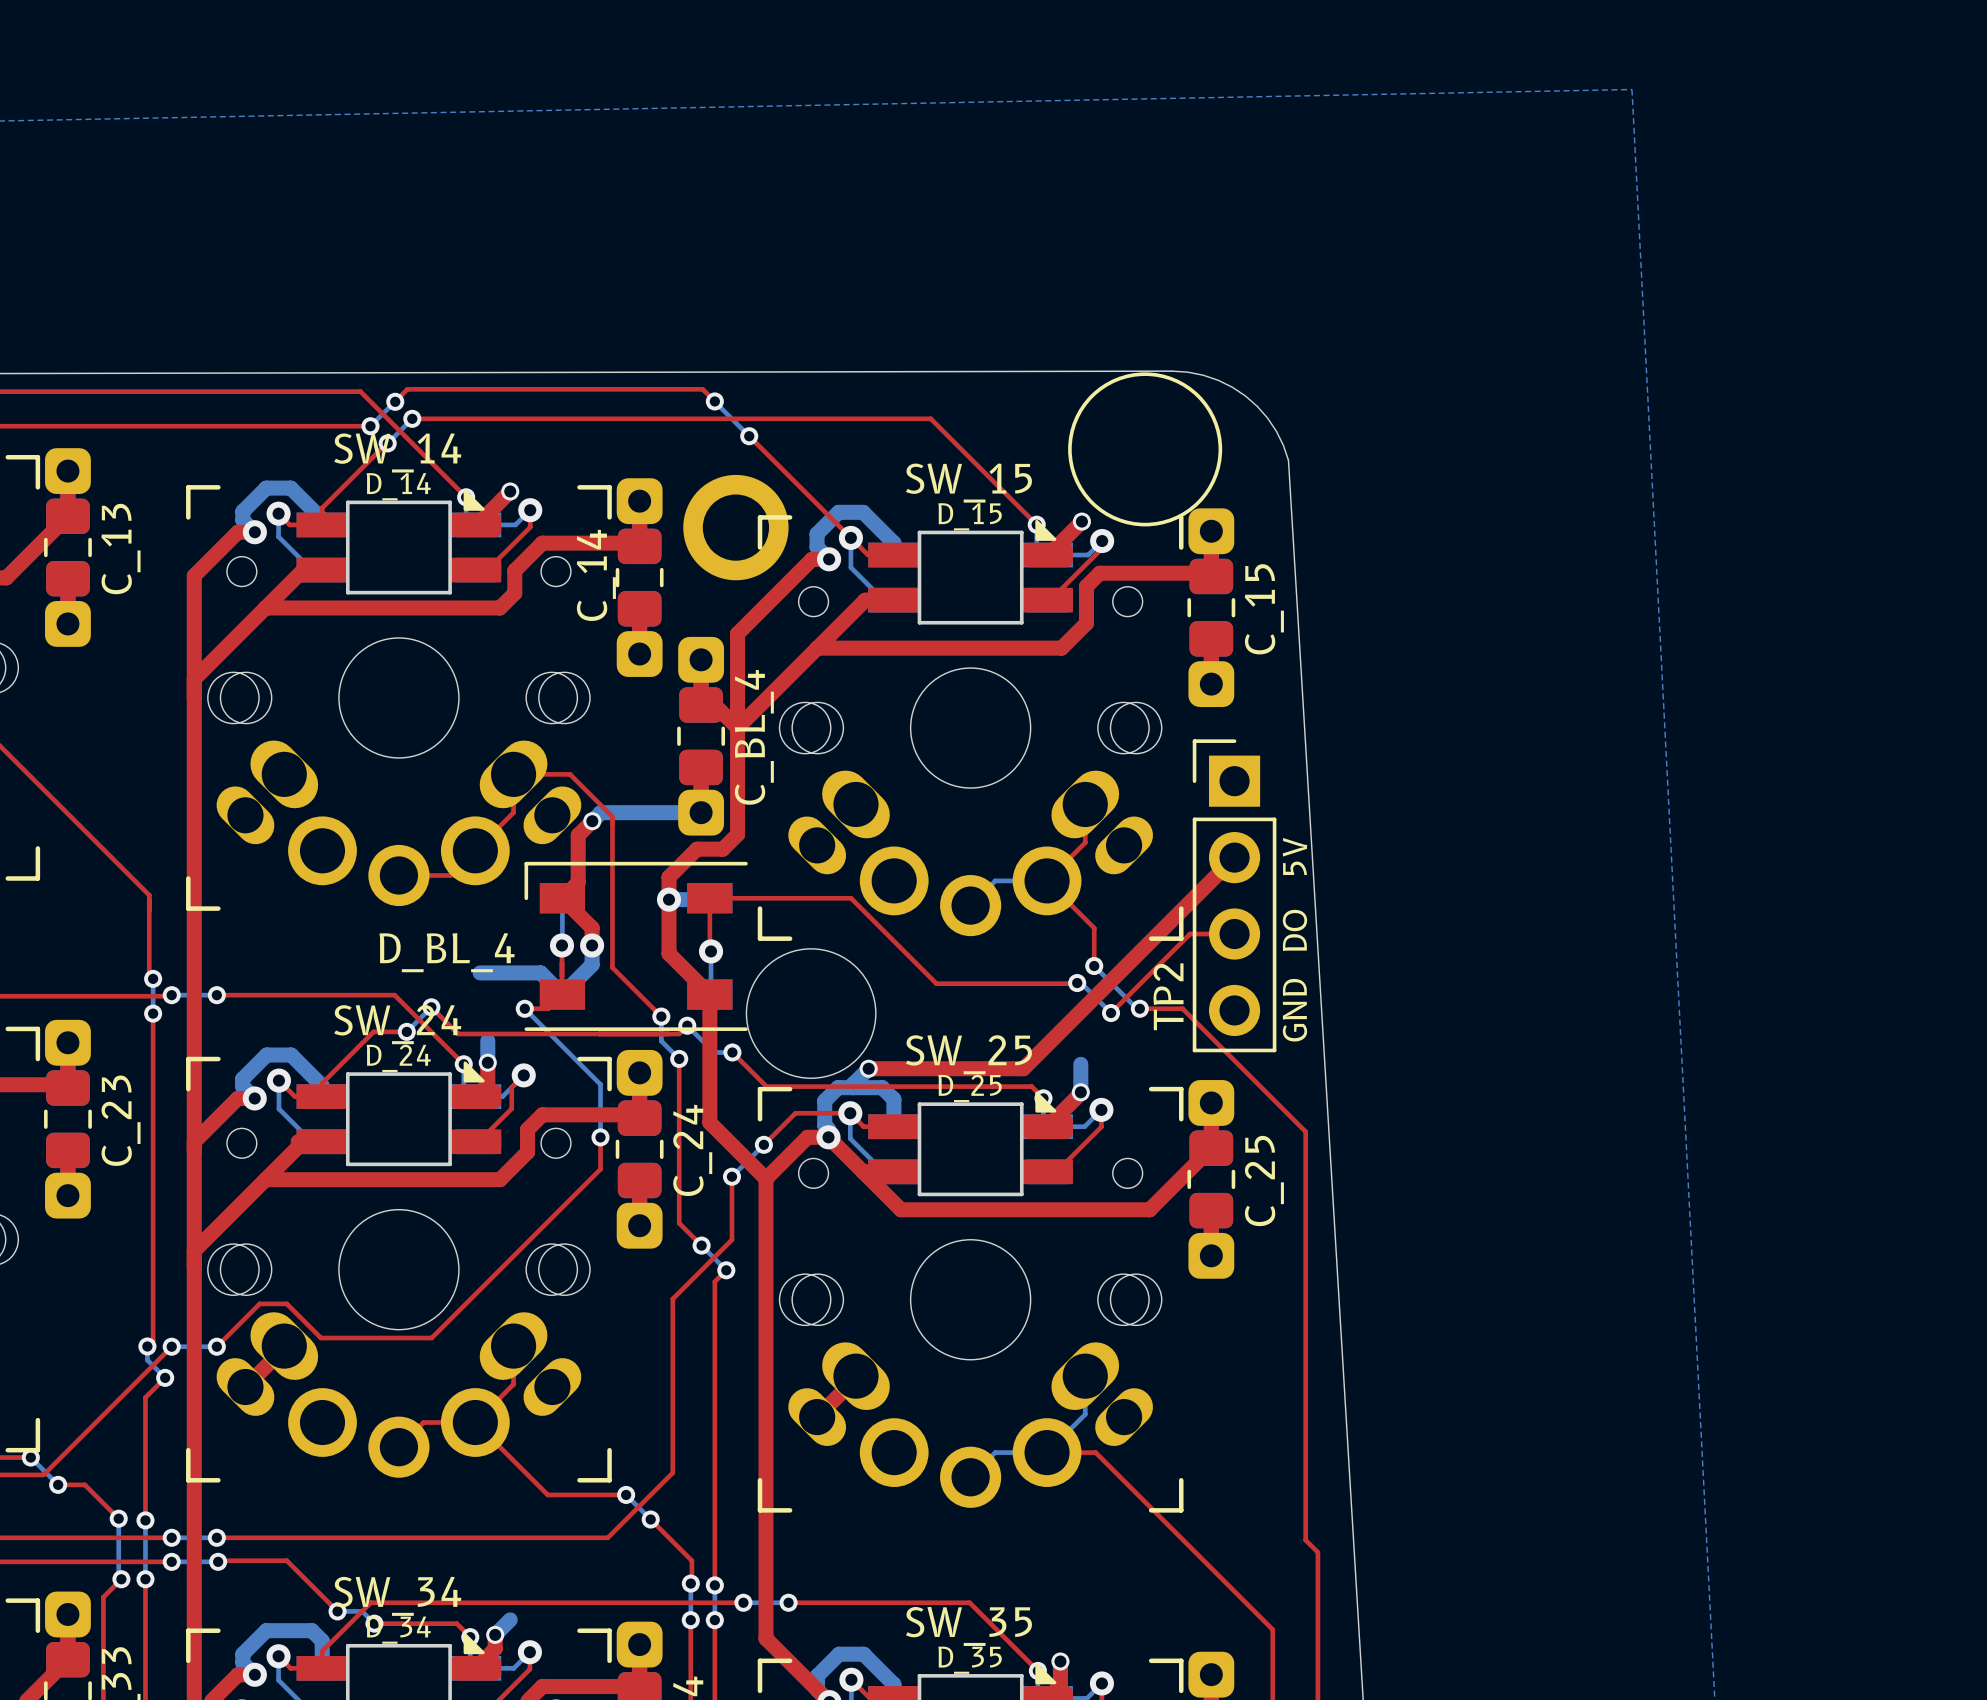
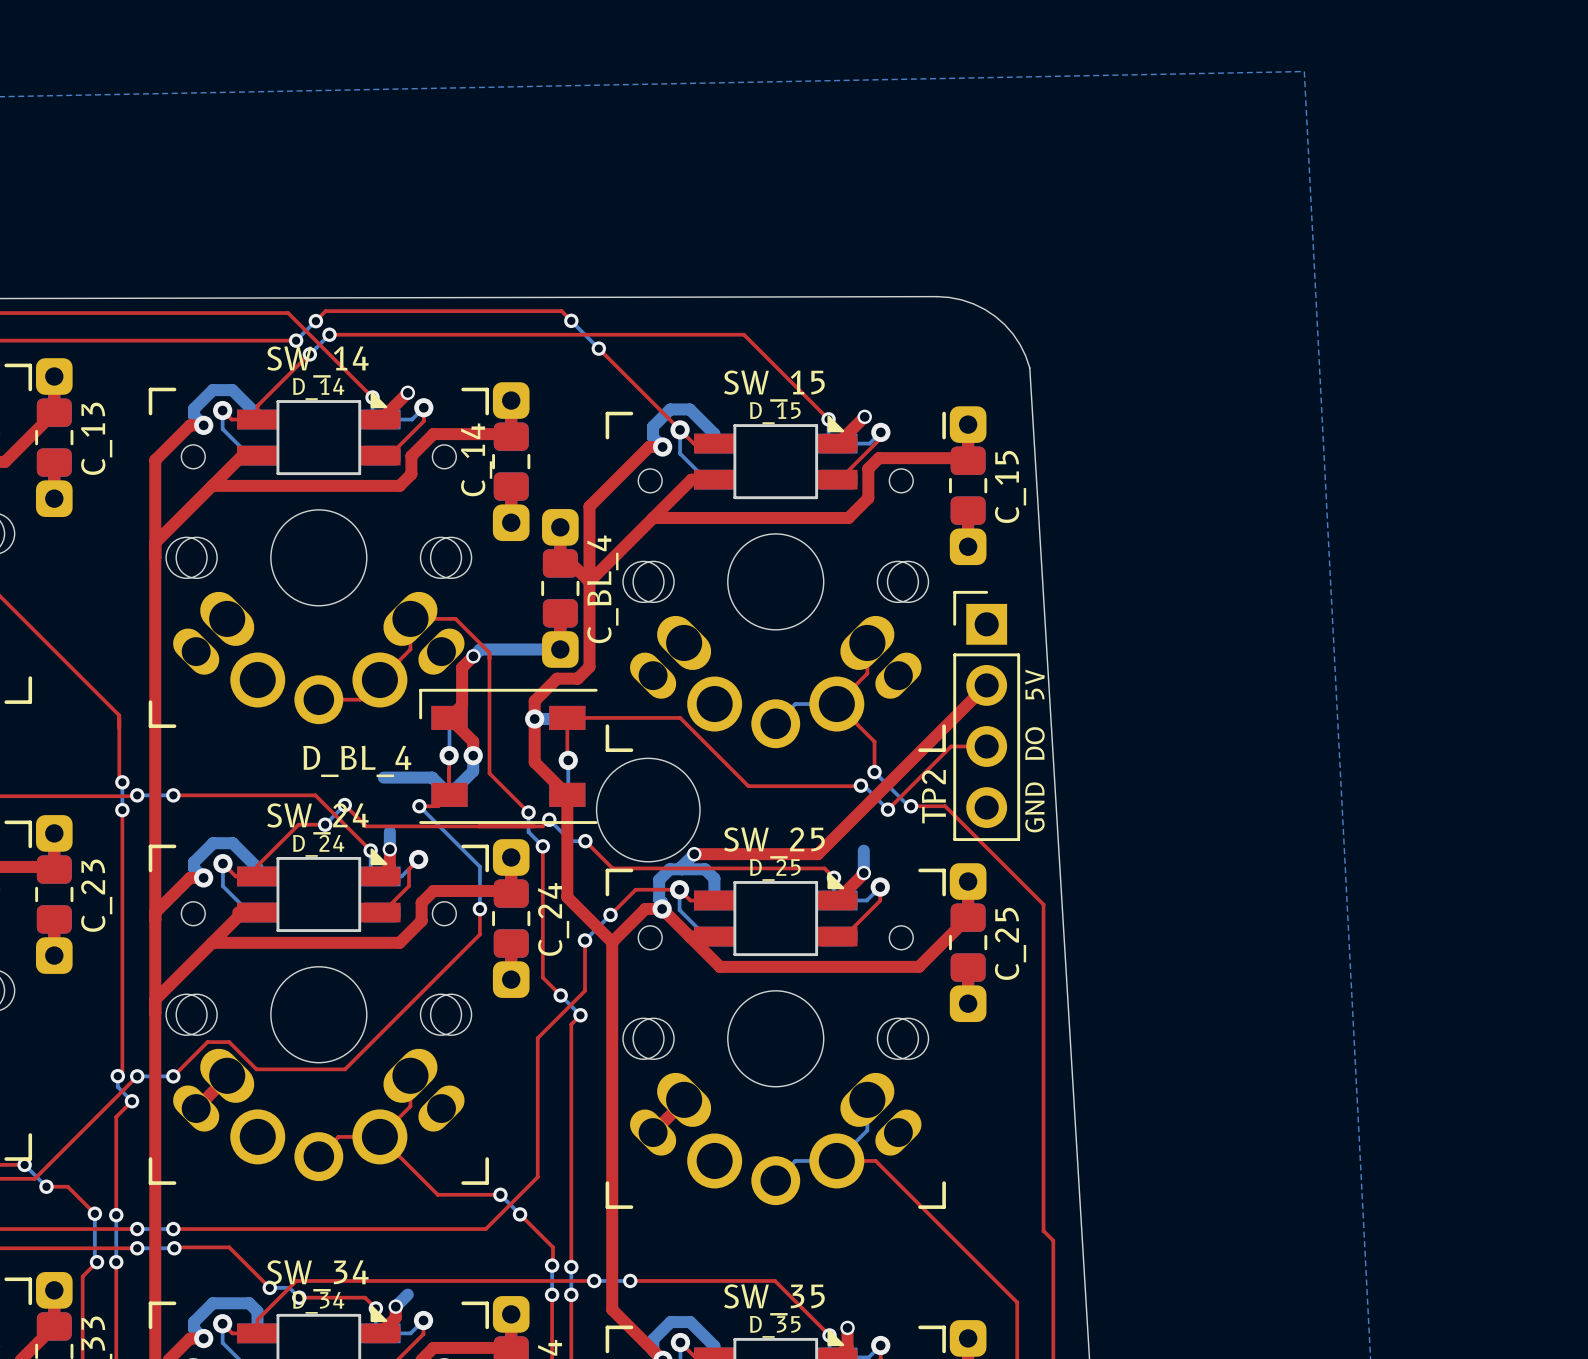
drawing: [1068, 372, 1223, 527] -> none
part: (735, 527) -> none

